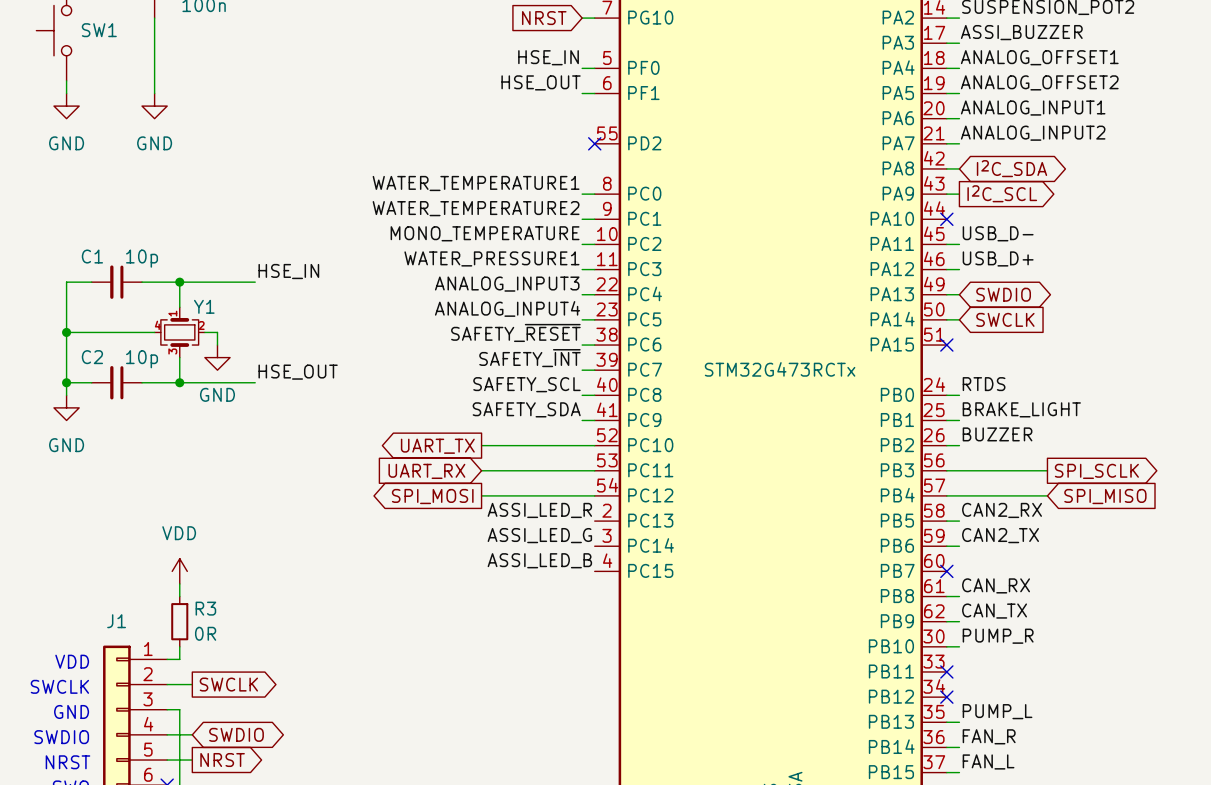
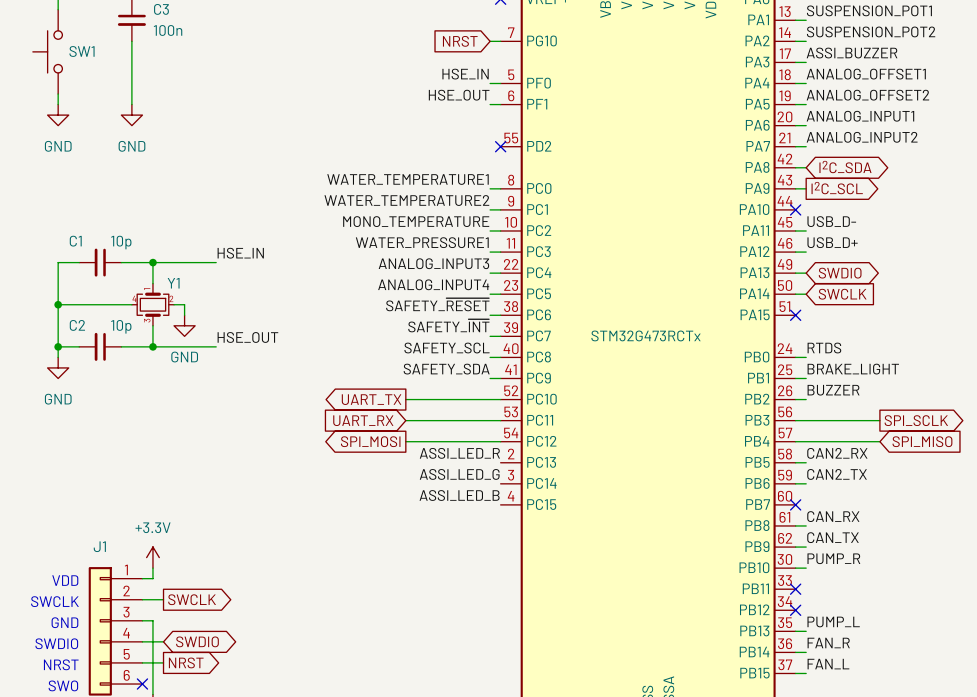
power symbol: VDD (179, 571) -> none
wire: (179, 583) (179, 596) -> none
R3: 0R (179, 621) -> none
power symbol: none -> +3.3V (152, 557)

